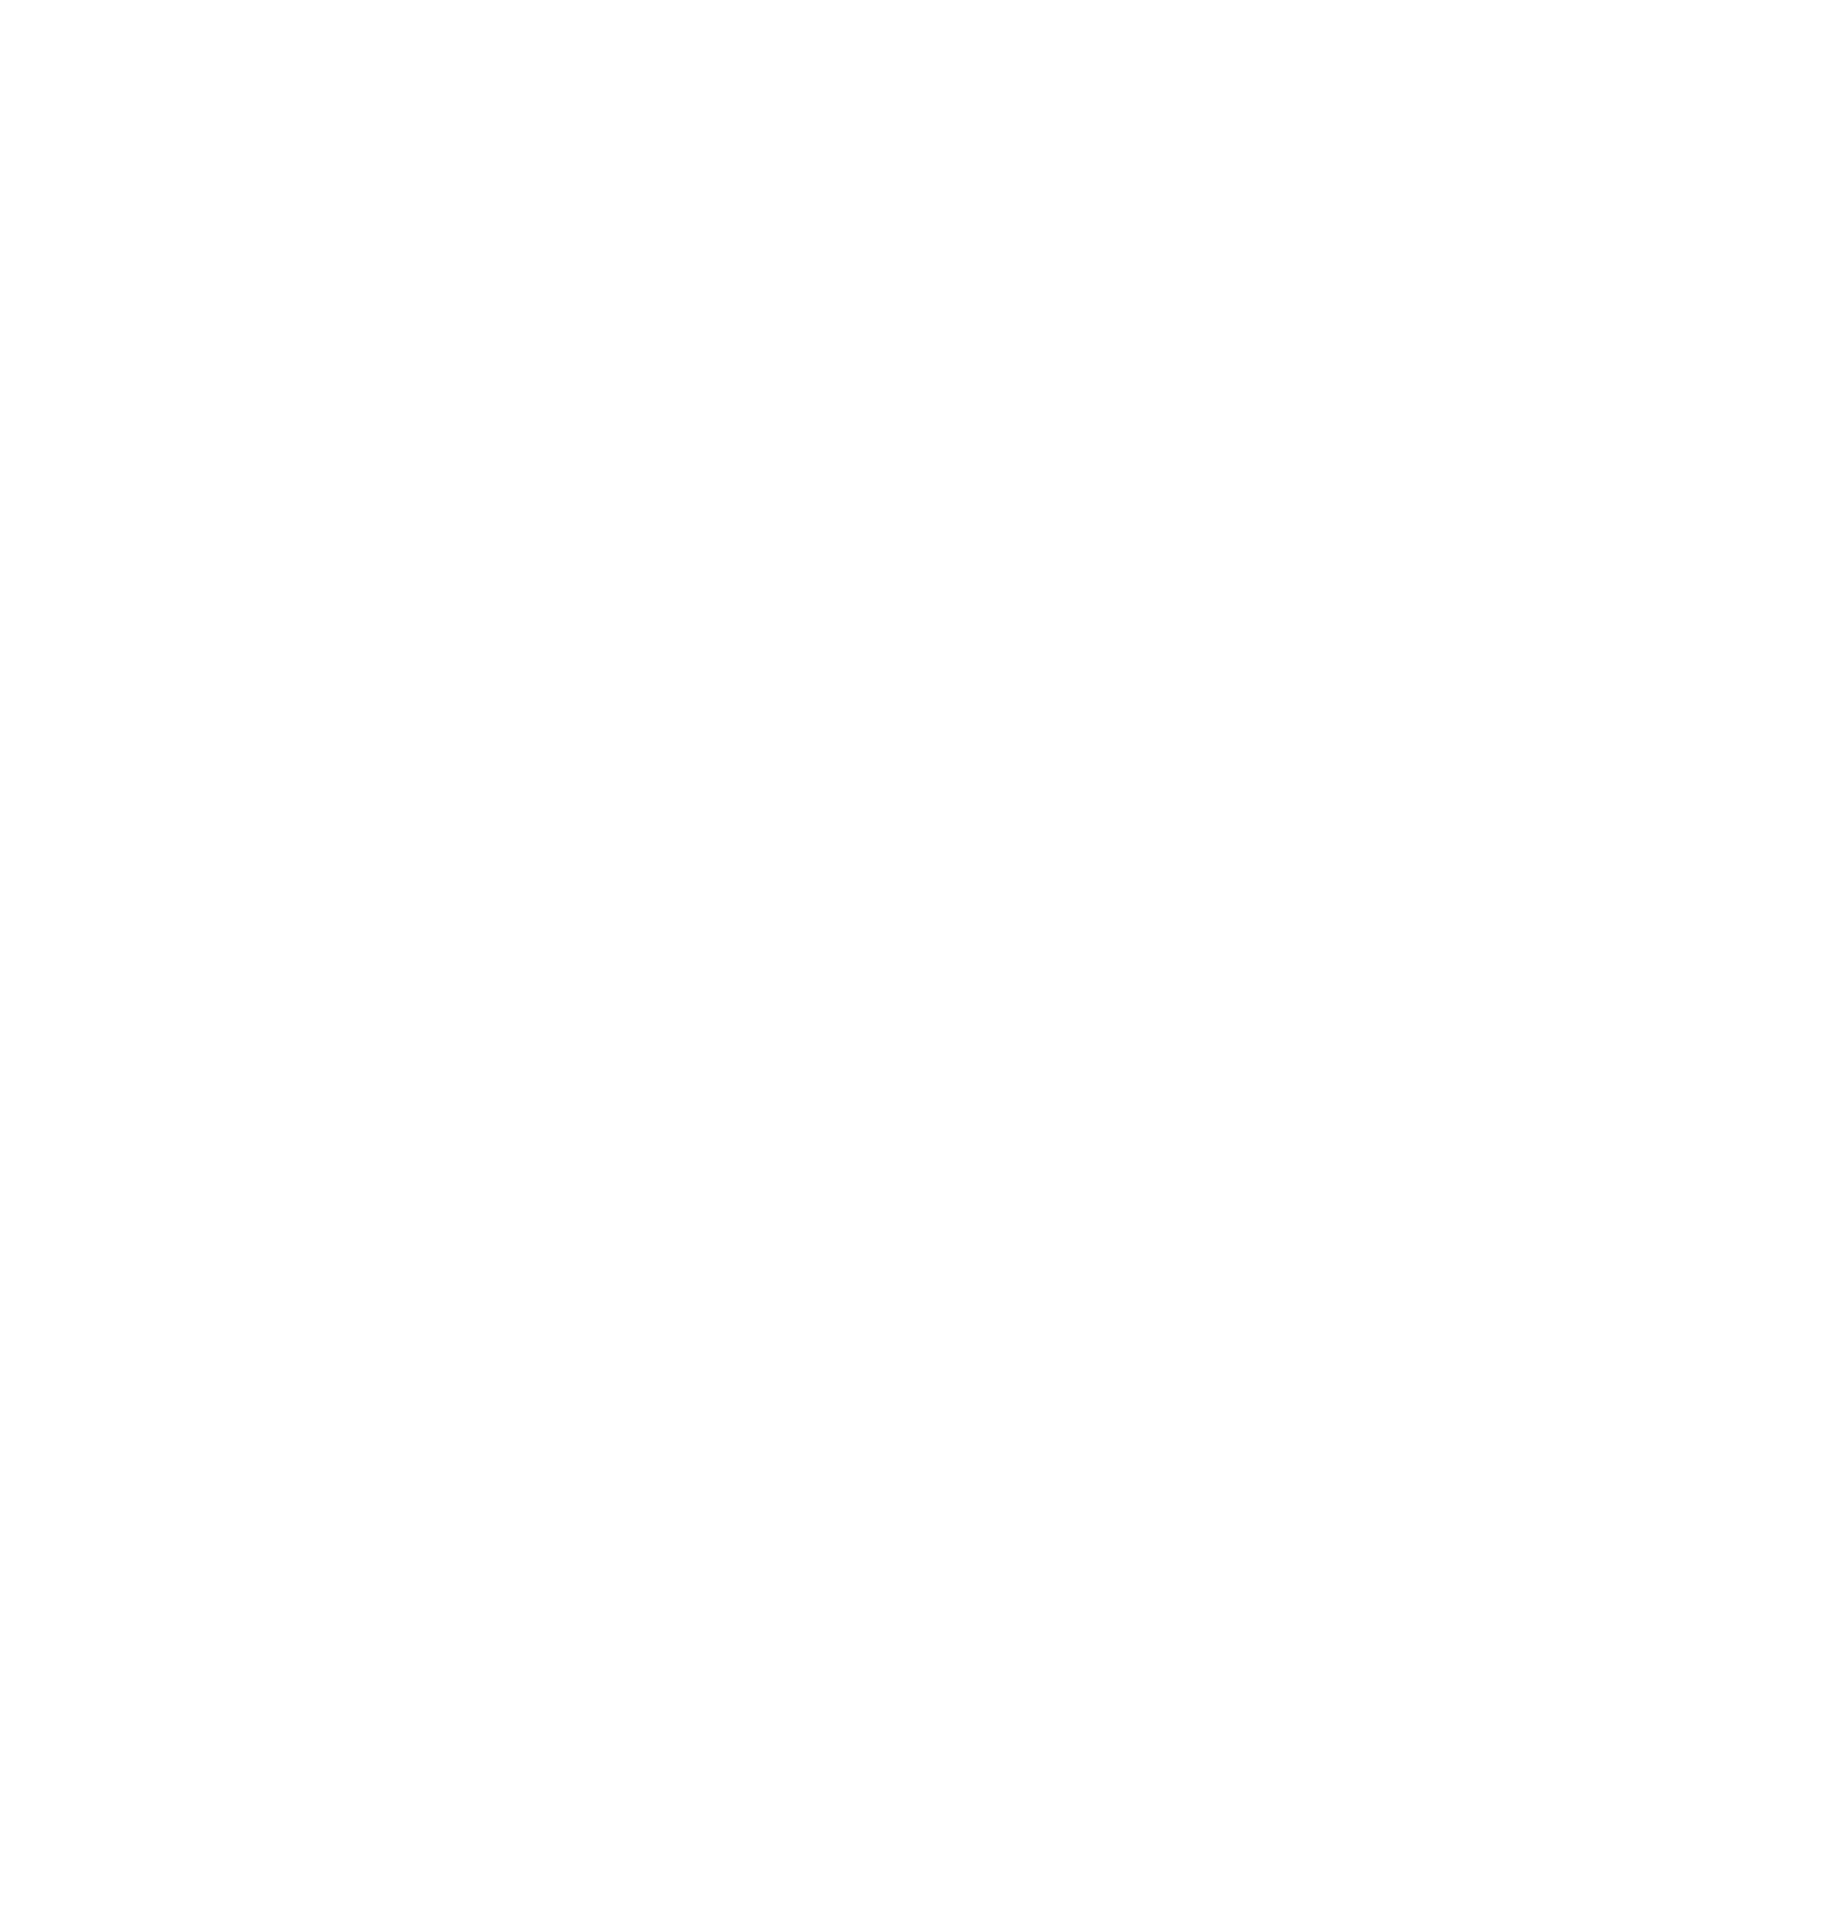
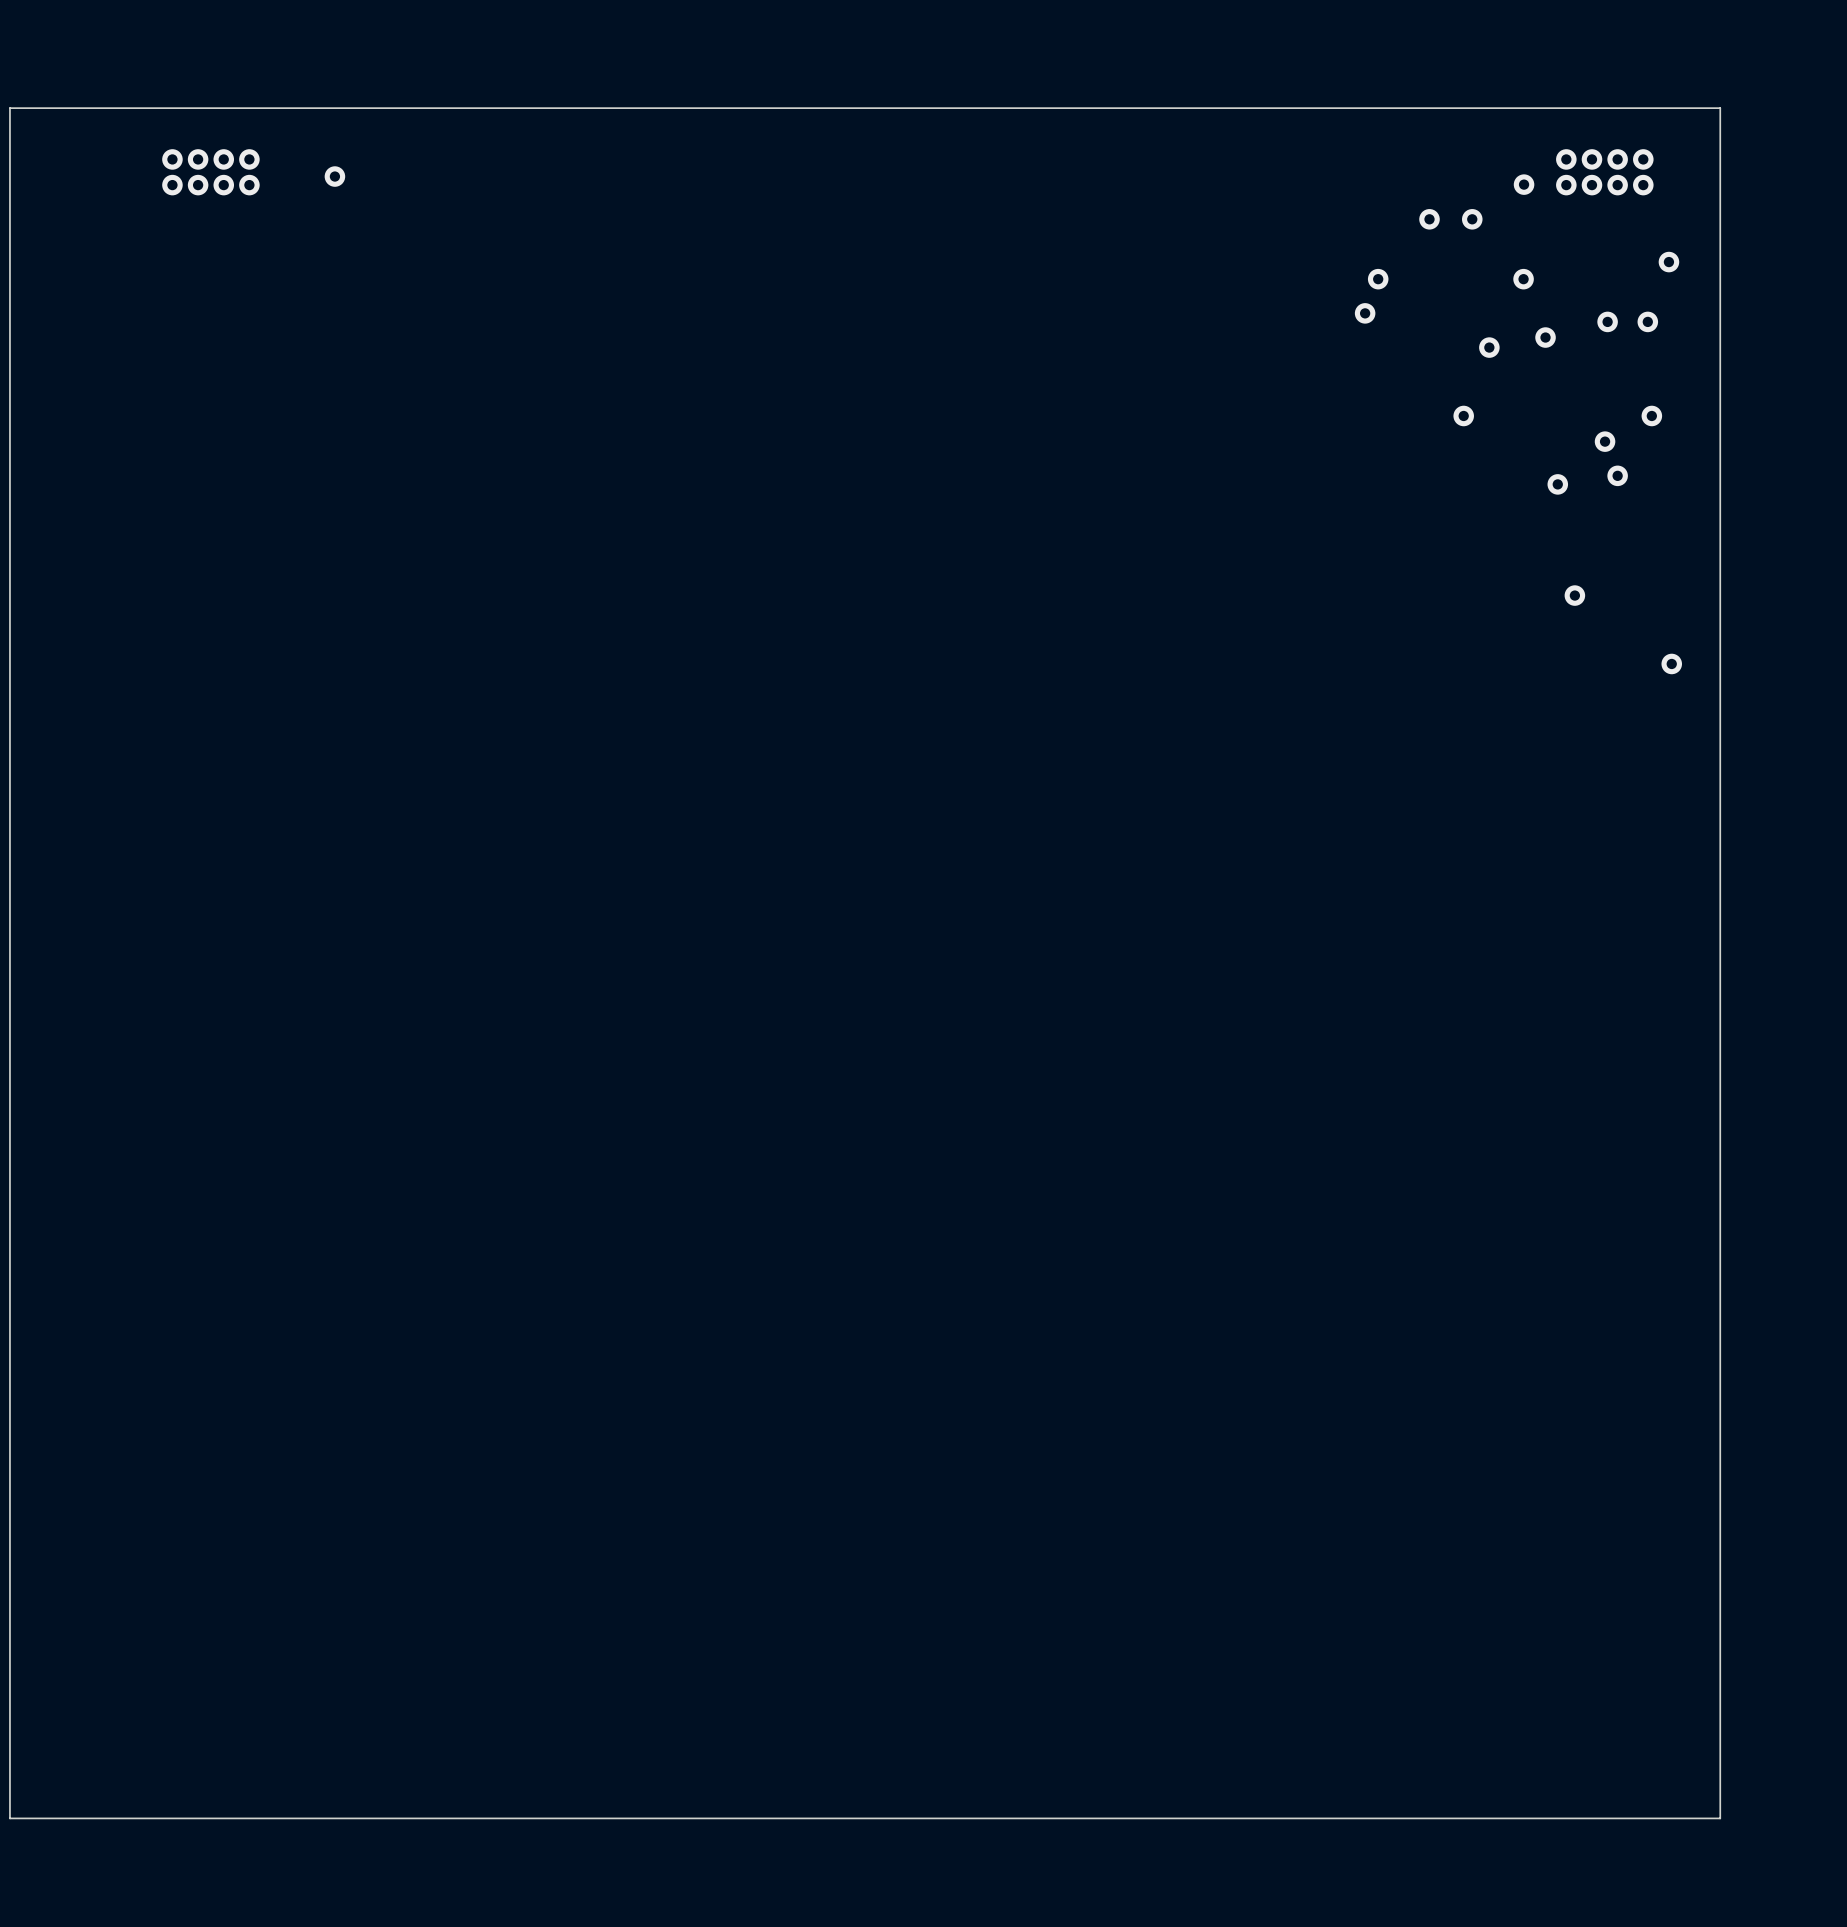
board edge: none -> (1720, 108) (9, 108) (9, 1818) (1720, 1818) (1720, 108)
via: none -> (172, 159)
via: none -> (198, 159)
via: none -> (223, 159)
via: none -> (249, 159)
via: none -> (1566, 159)
via: none -> (1591, 159)
via: none -> (1617, 159)
via: none -> (1643, 159)
via: none -> (334, 176)
via: none -> (1524, 184)
via: none -> (172, 185)
via: none -> (198, 185)
via: none -> (223, 185)
via: none -> (249, 185)
via: none -> (1566, 185)
via: none -> (1591, 185)
via: none -> (1617, 185)
via: none -> (1643, 185)
via: none -> (1429, 219)
via: none -> (1472, 219)
via: none -> (1668, 262)
via: none -> (1378, 279)
via: none -> (1523, 279)
via: none -> (1365, 313)
via: none -> (1607, 321)
via: none -> (1647, 321)
via: none -> (1545, 337)
via: none -> (1489, 347)
via: none -> (1463, 415)
via: none -> (1651, 415)
via: none -> (1605, 441)
via: none -> (1617, 475)
via: none -> (1557, 484)
via: none -> (1574, 595)
via: none -> (1671, 663)

